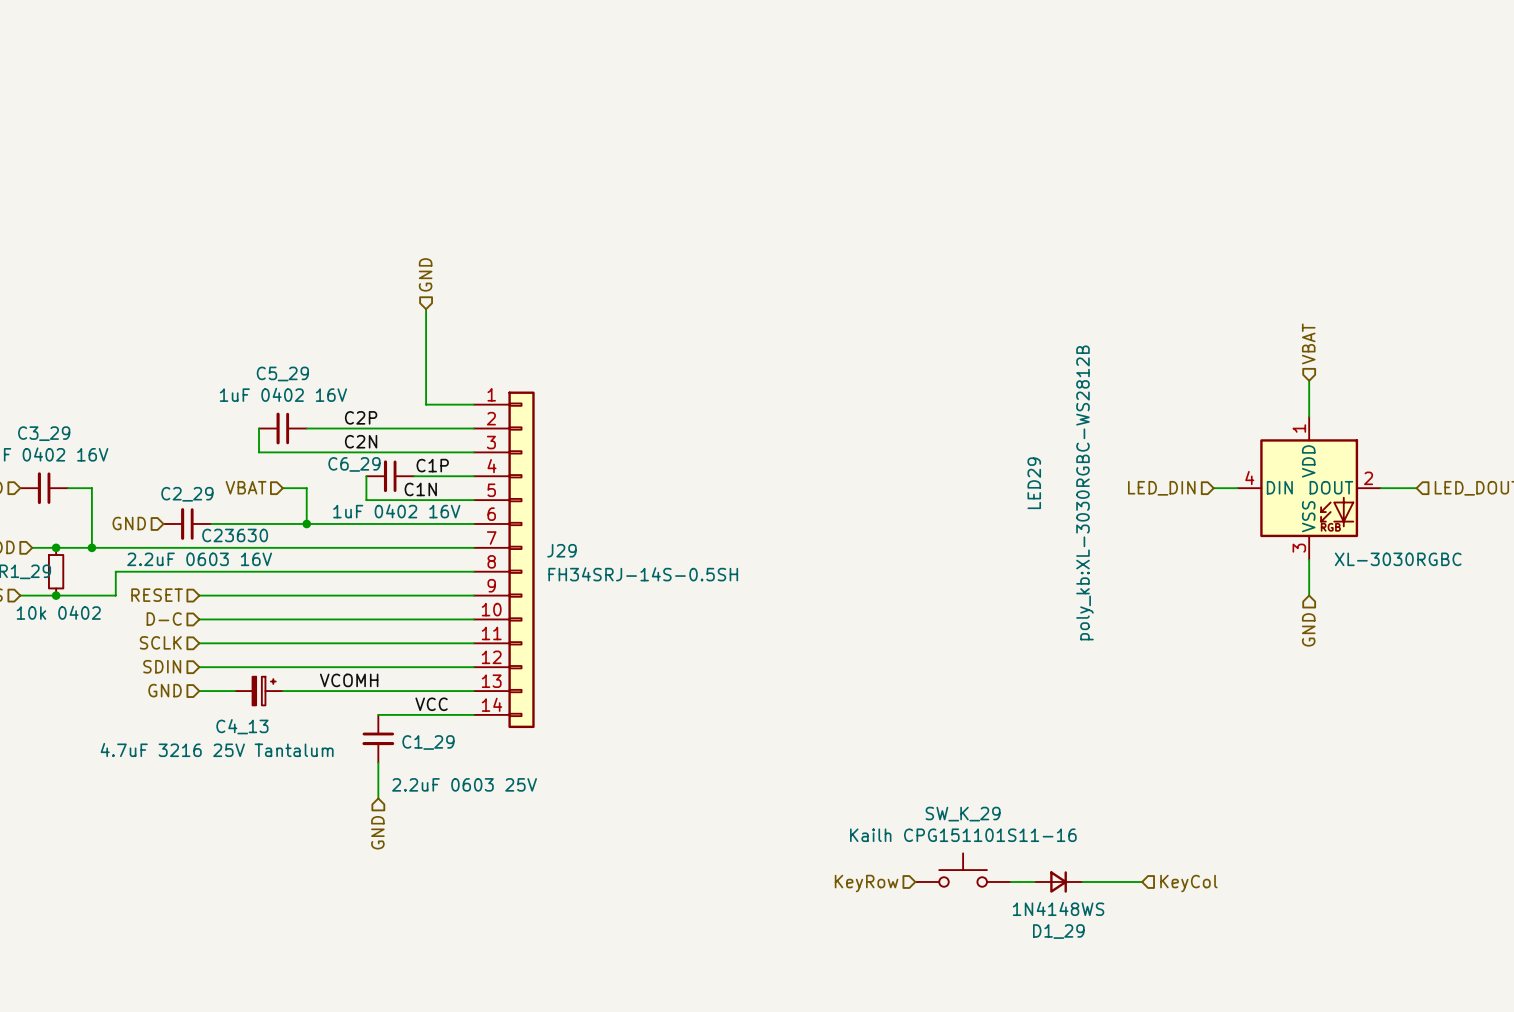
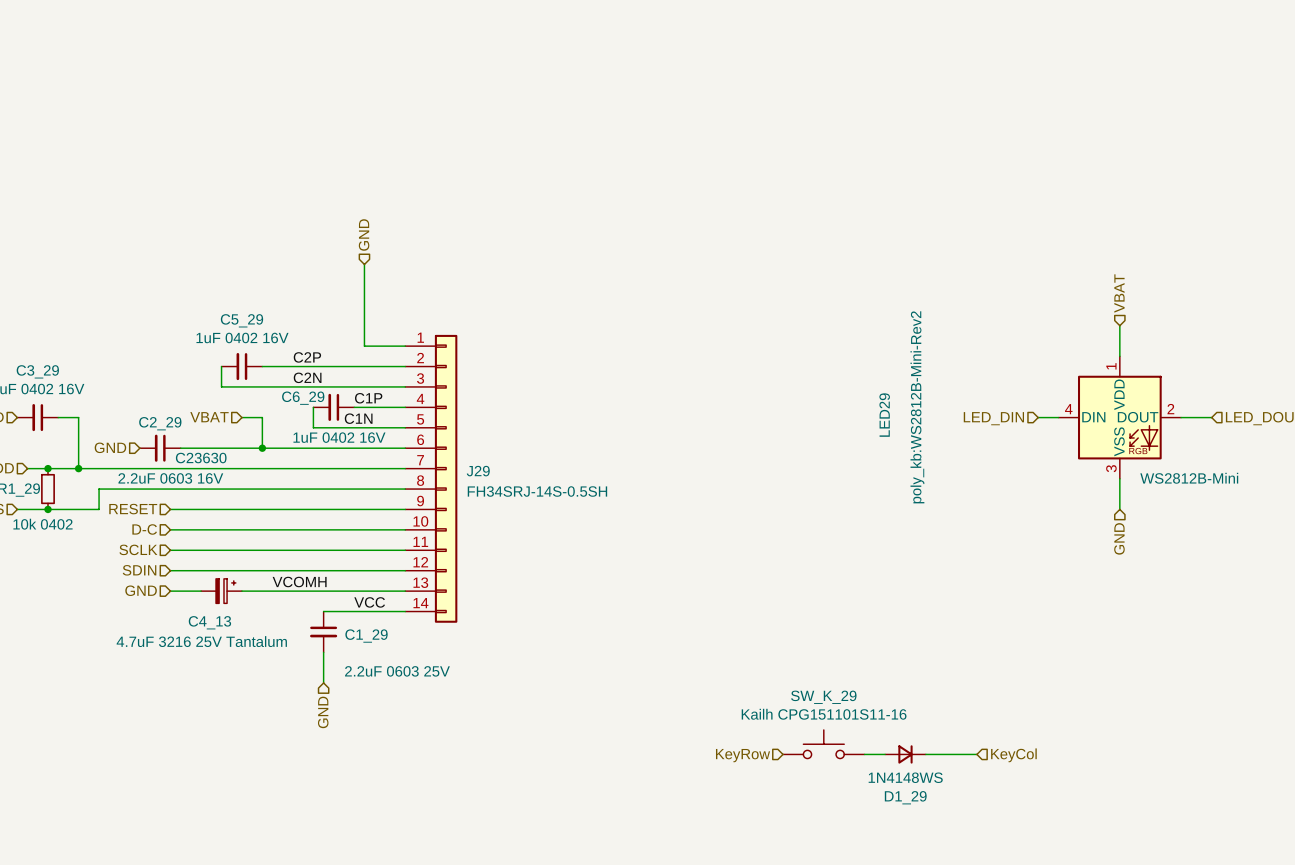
LED29 text: poly_kb:XL-3030RGBC-WS2812B (1084, 492) -> poly_kb:WS2812B-Mini-Rev2 (917, 407)
LED29 value: XL-3030RGBC (1398, 559) -> WS2812B-Mini (1189, 478)

